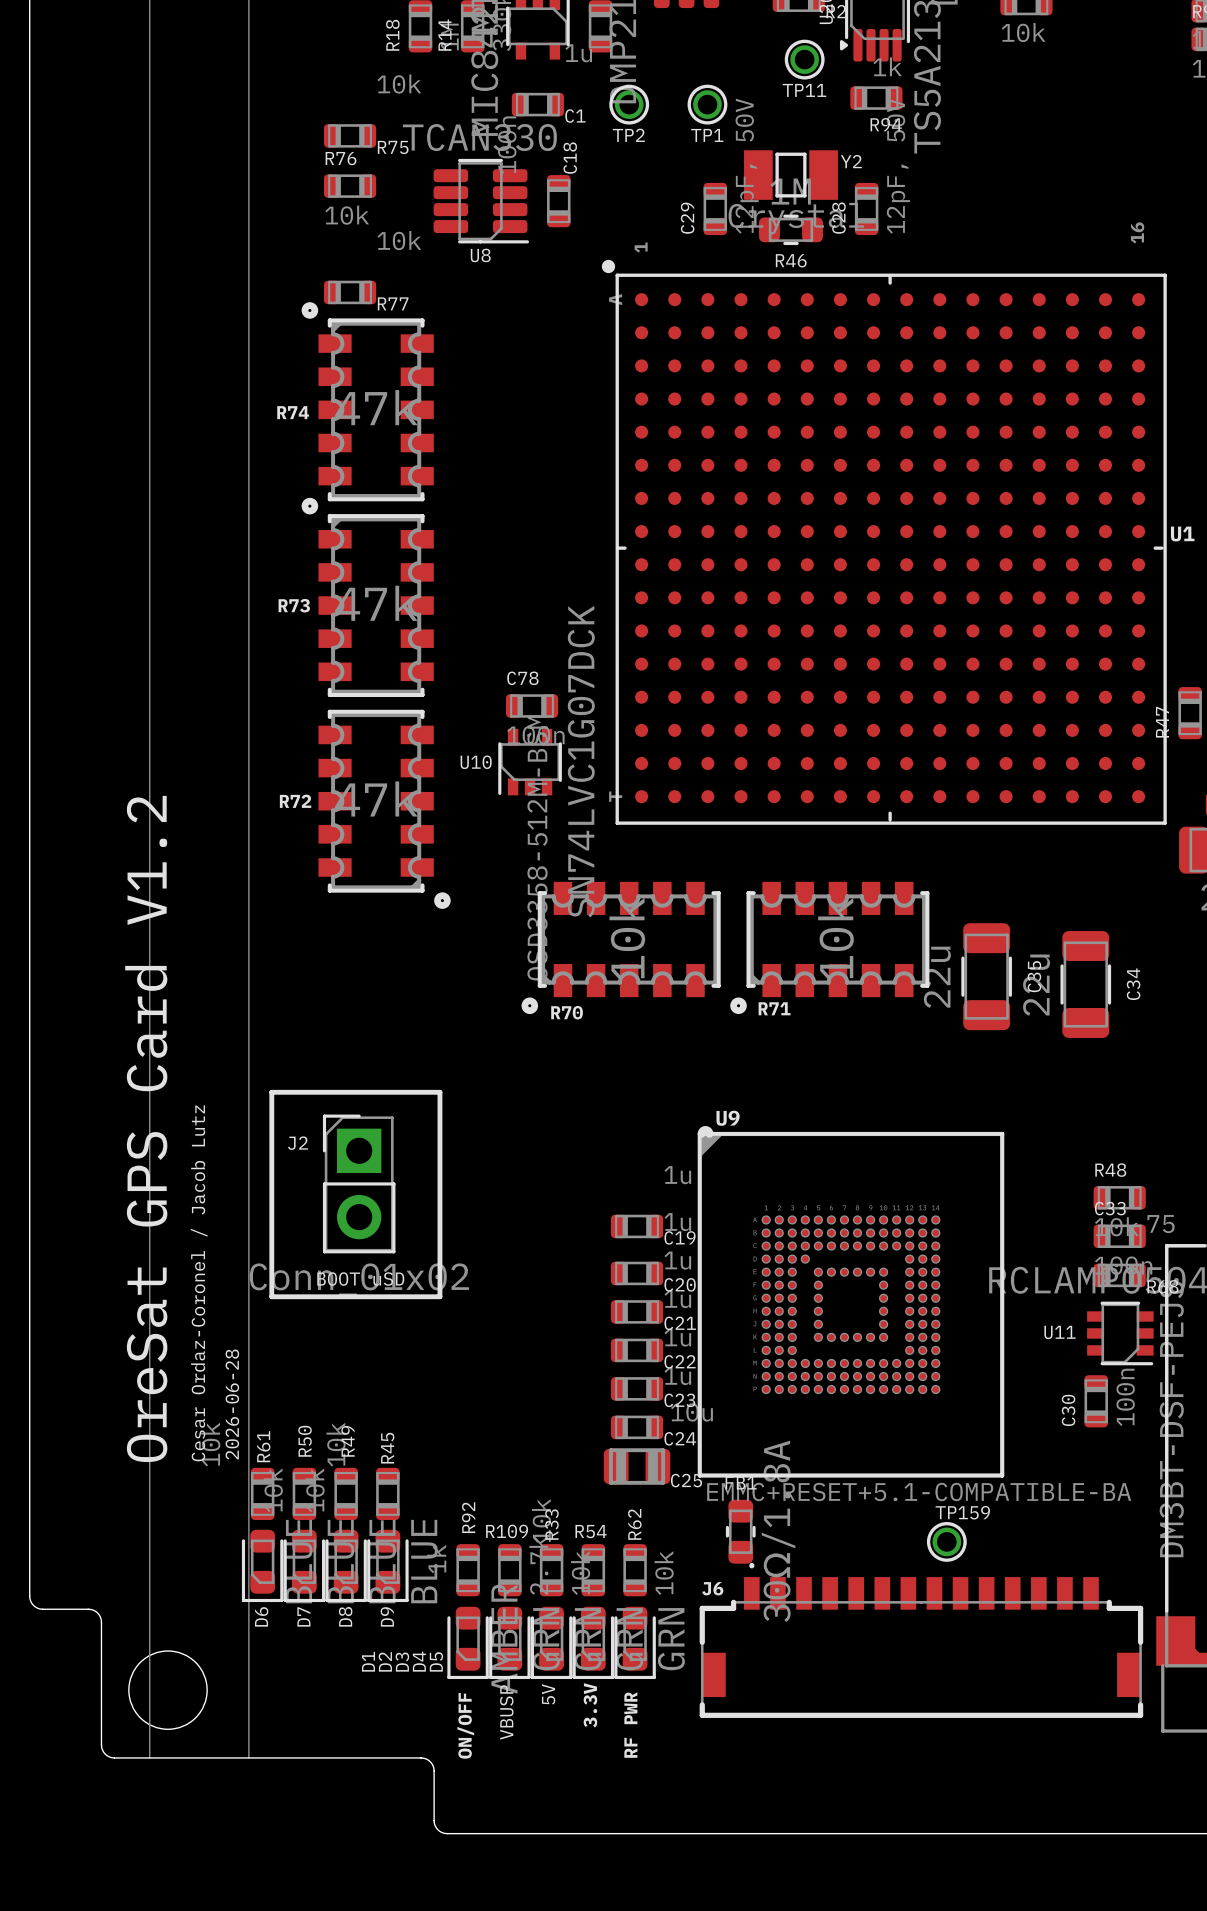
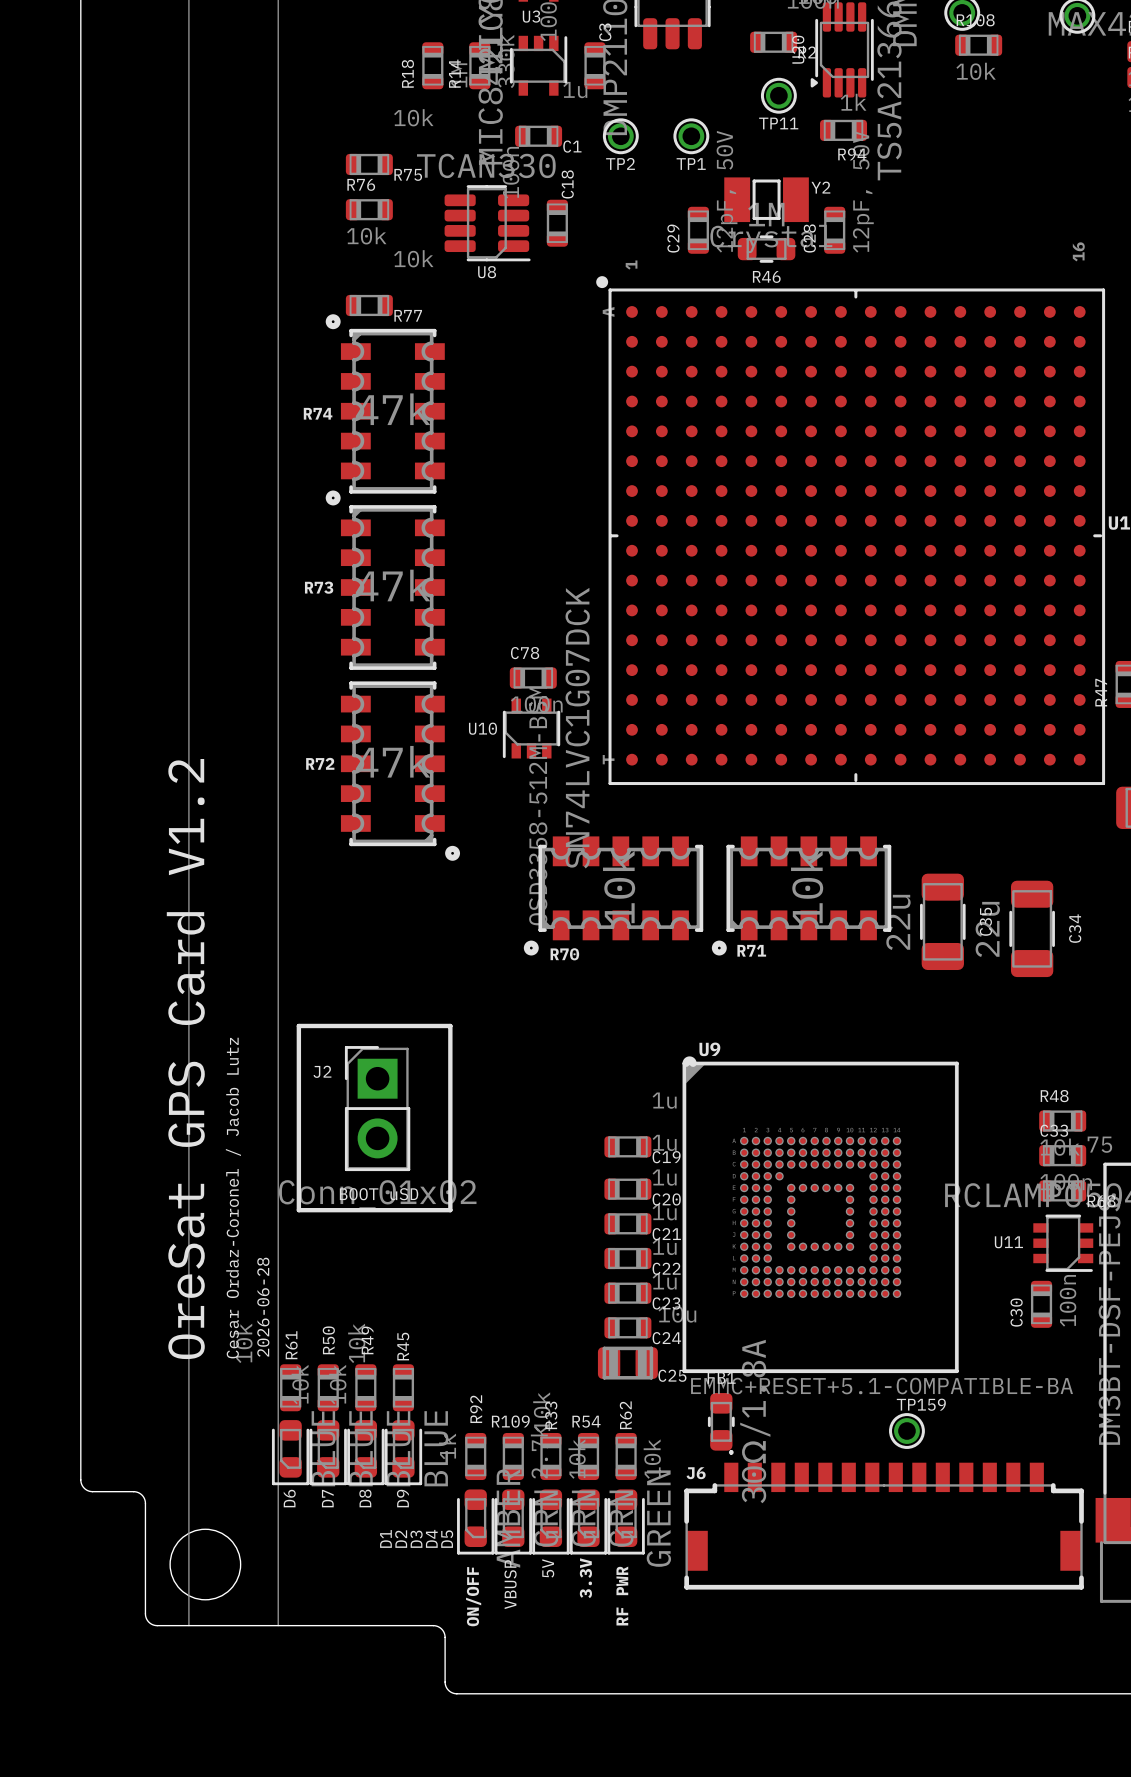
D5 value: GRN (671, 1639) -> GREEN (658, 1518)

